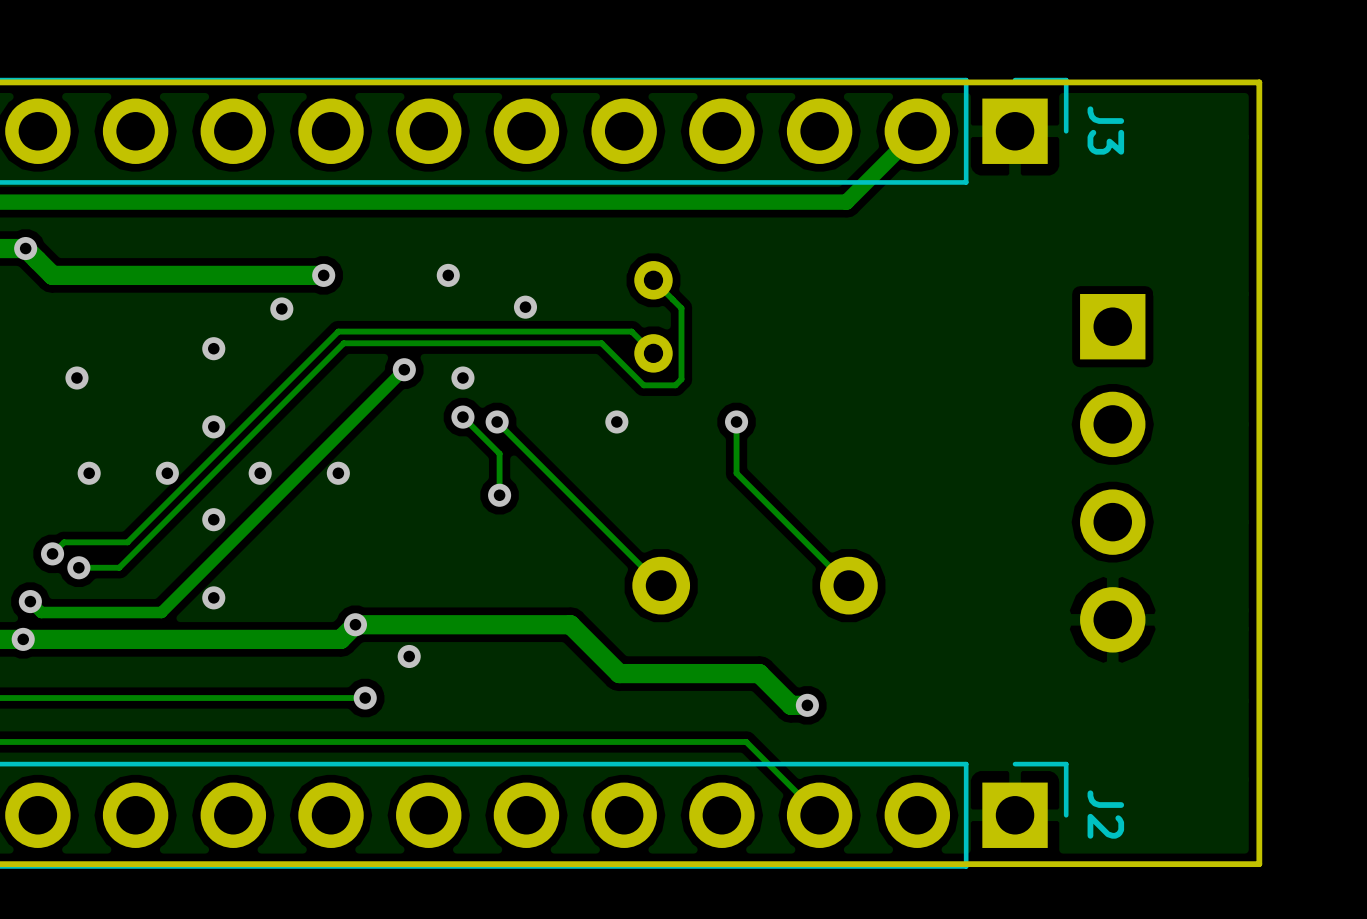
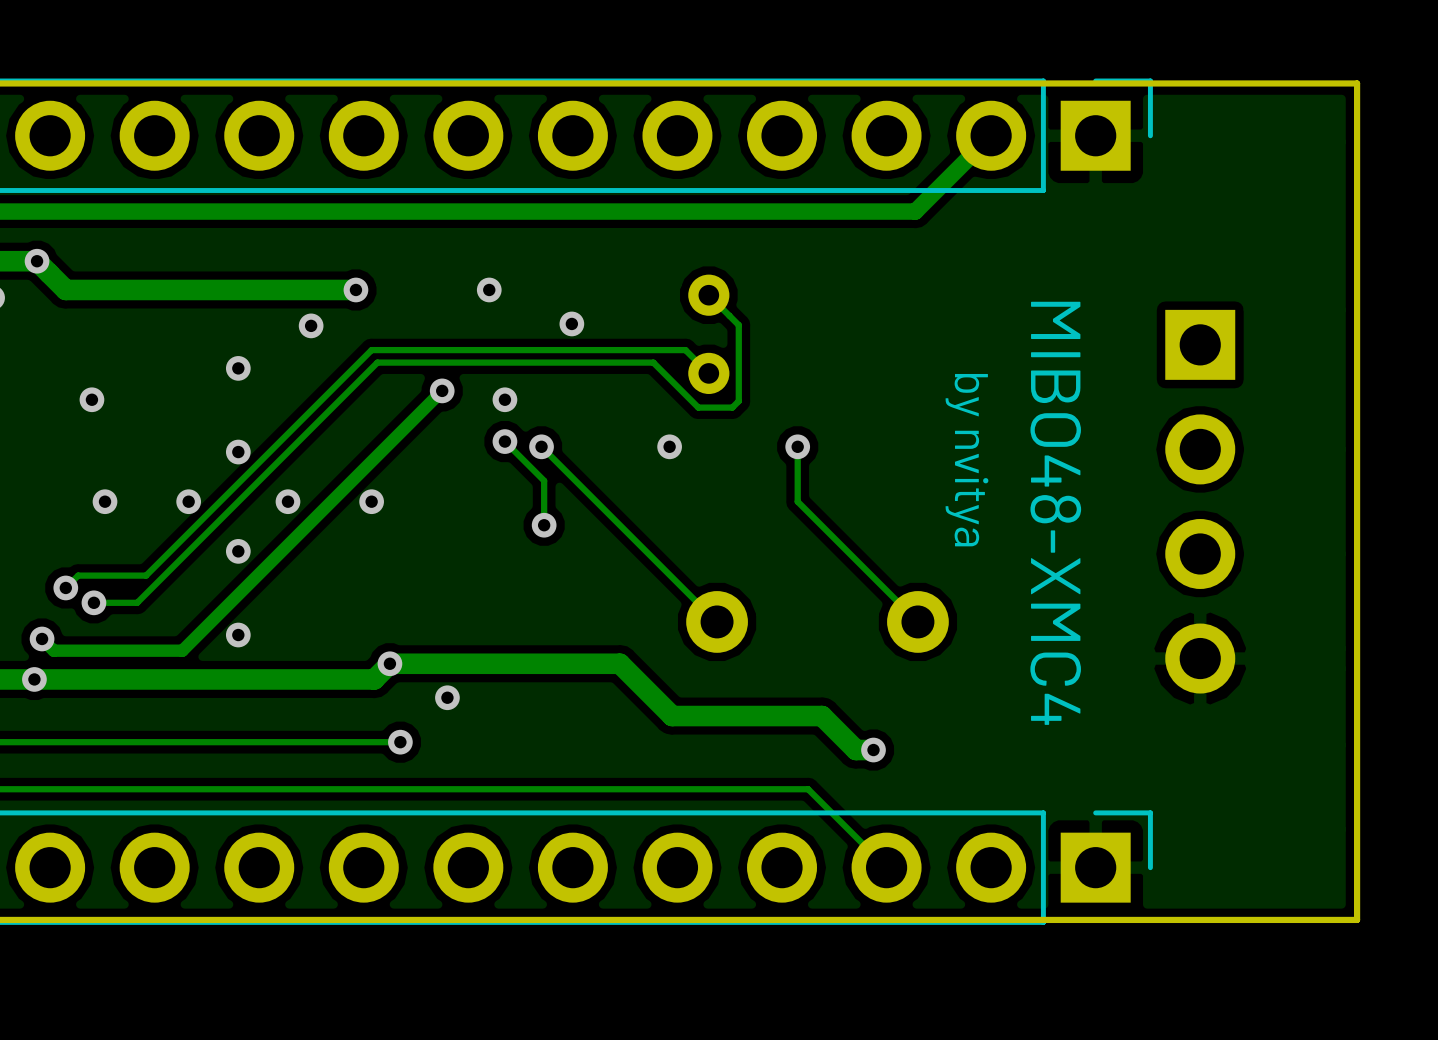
J3 name: J3 (1105, 130) -> none
text: none -> by nvitya (966, 460)
text: none -> MIBO48-XMC4 (1055, 513)
J2 name: J2 (1105, 814) -> none

